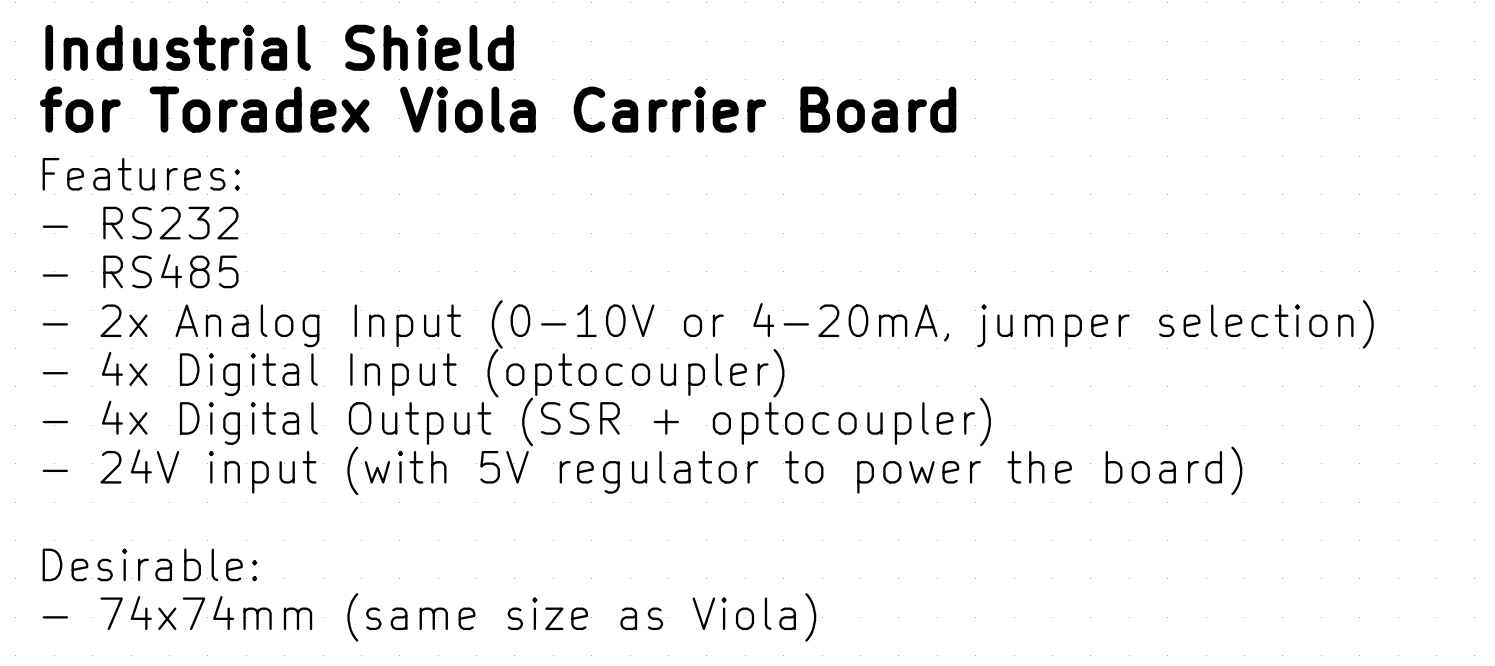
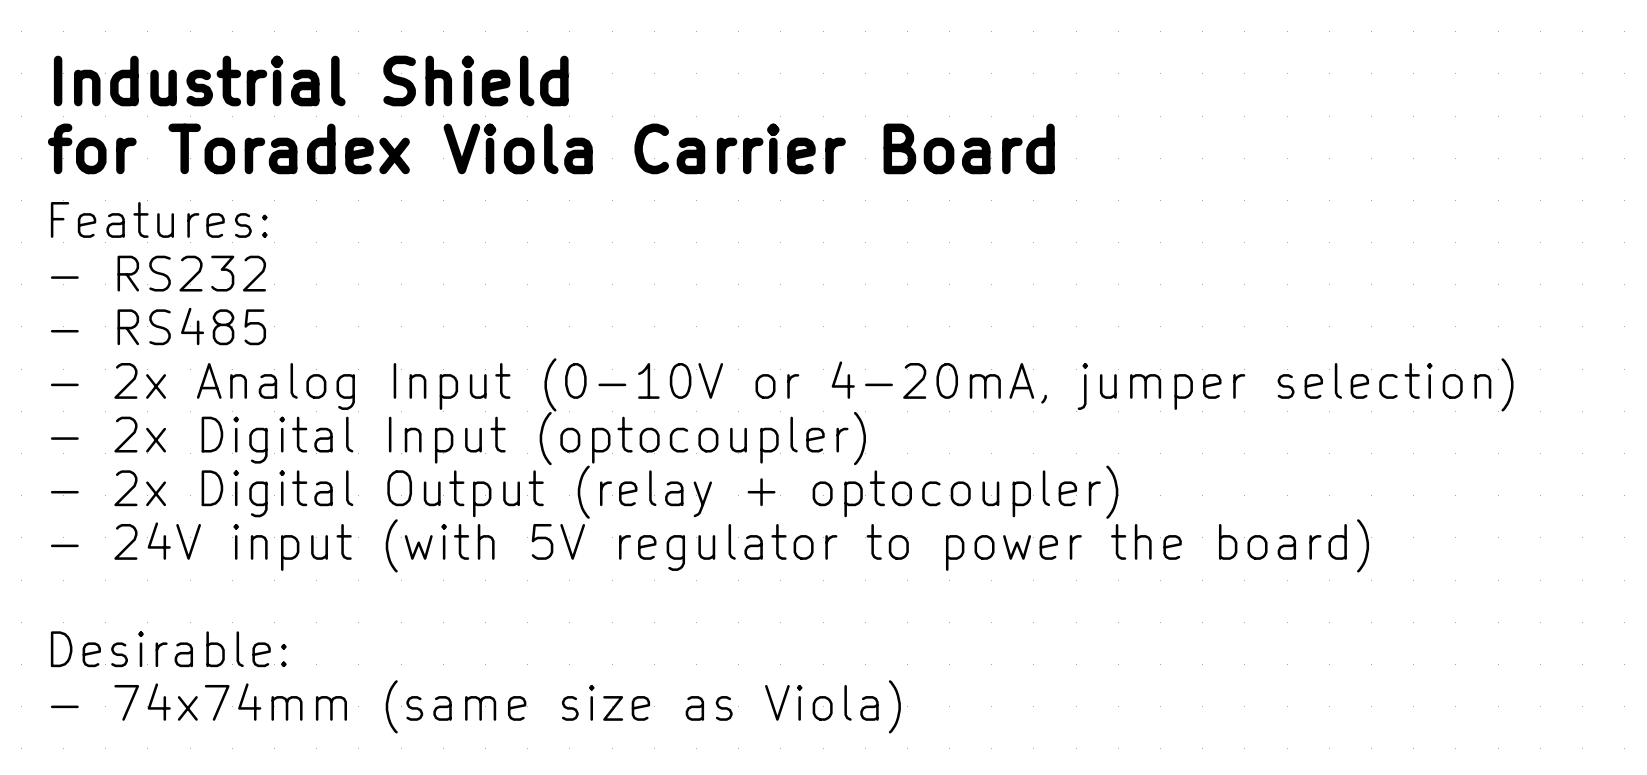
text: - 4x Digital Input (optocoupler) (413, 373) -> - 2x Digital Input (optocoupler) (458, 438)
text: - 4x Digital Output (SSR + optocoupler) (516, 422) -> - 2x Digital Output (relay + optocoupler) (584, 492)

